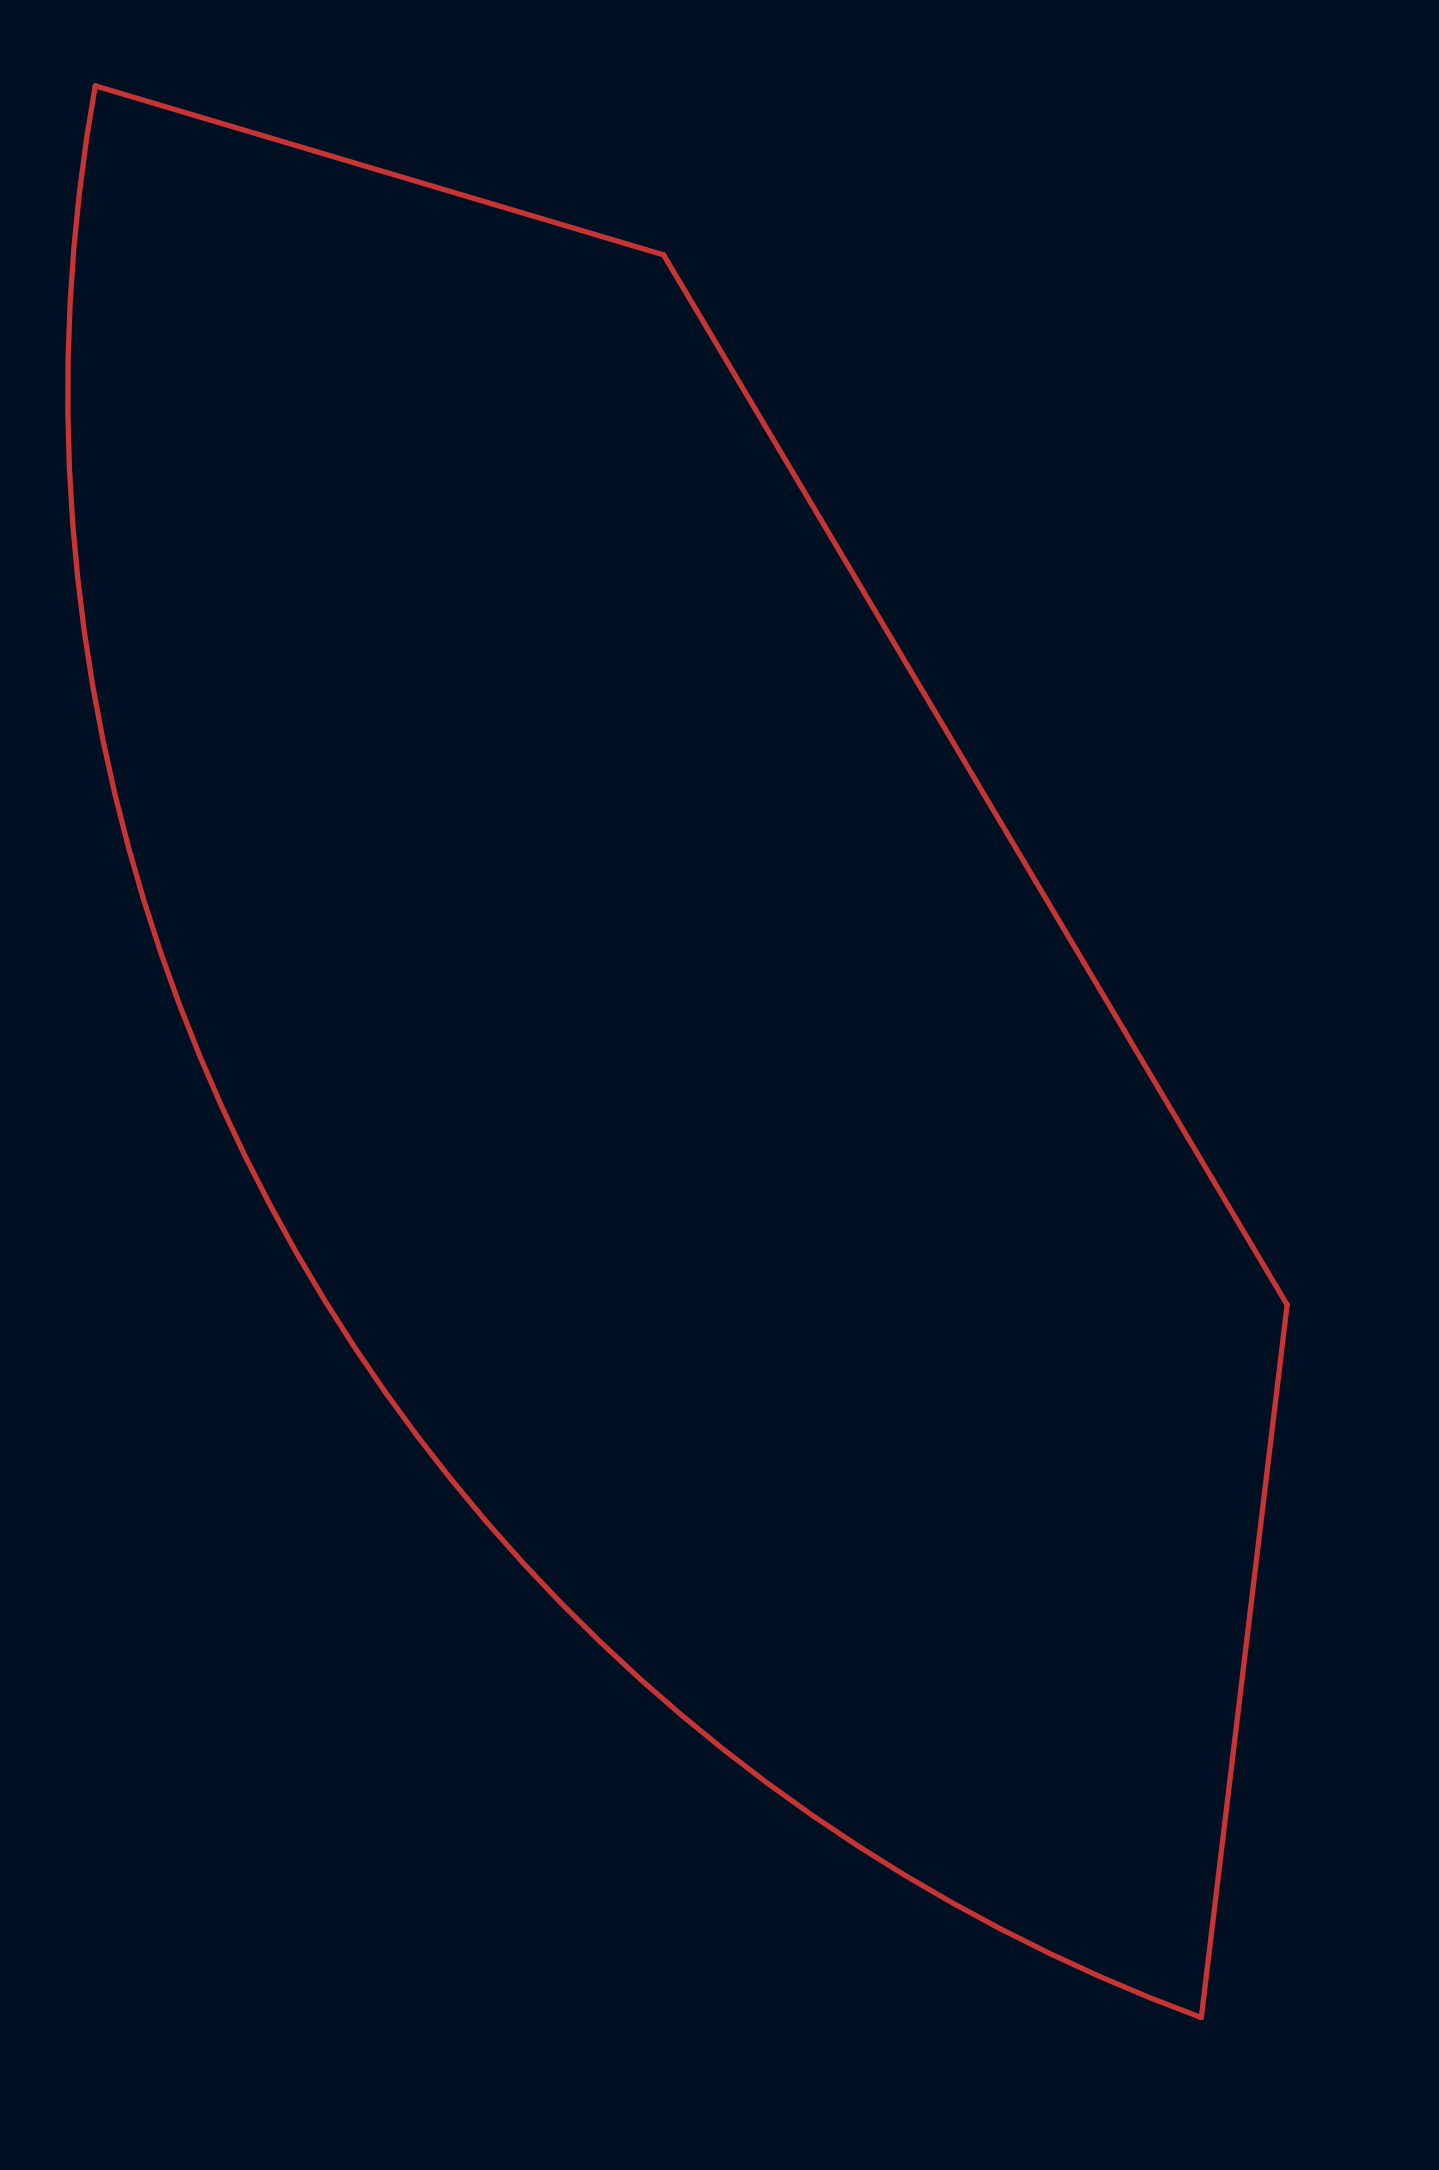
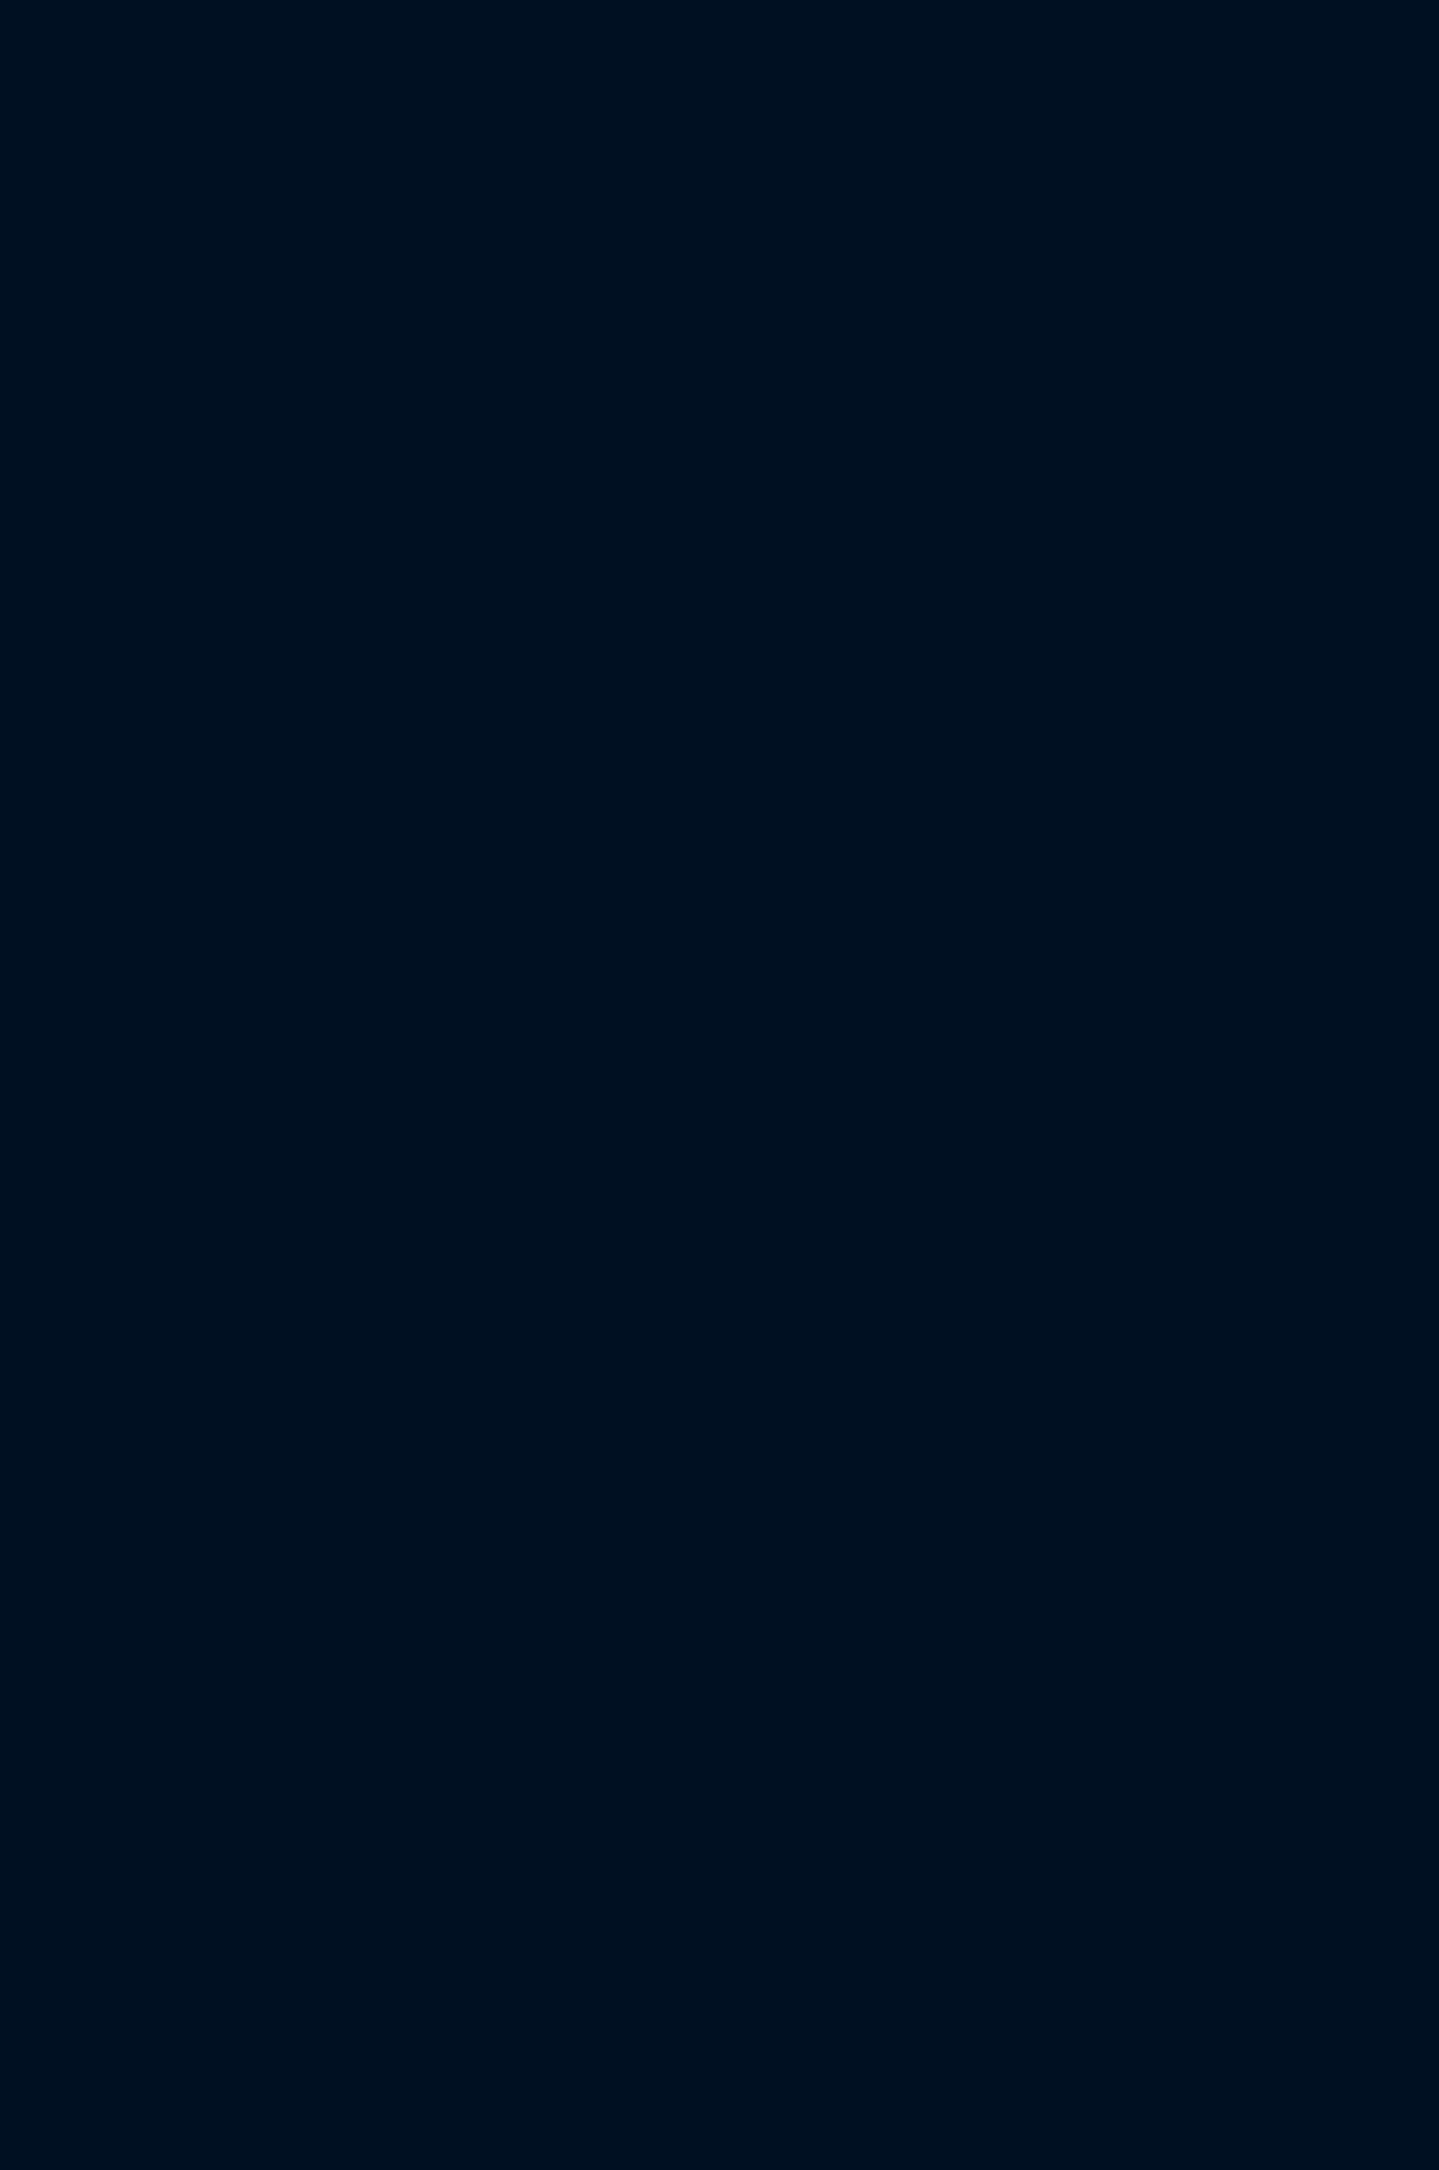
track: (95, 85) (663, 254) (1287, 1304) (1201, 2017) (1099, 1976) (1049, 1953) (1000, 1928) (904, 1875) (812, 1815) (724, 1749) (681, 1715) (599, 1641) (523, 1562) (486, 1521) (451, 1479) (385, 1392) (354, 1346) (296, 1253) (245, 1156) (221, 1106) (179, 1004) (143, 900) (128, 848) (115, 794) (92, 687) (77, 578) (69, 468) (67, 413) (70, 304) (73, 249) (86, 140) (95, 85) -> none

